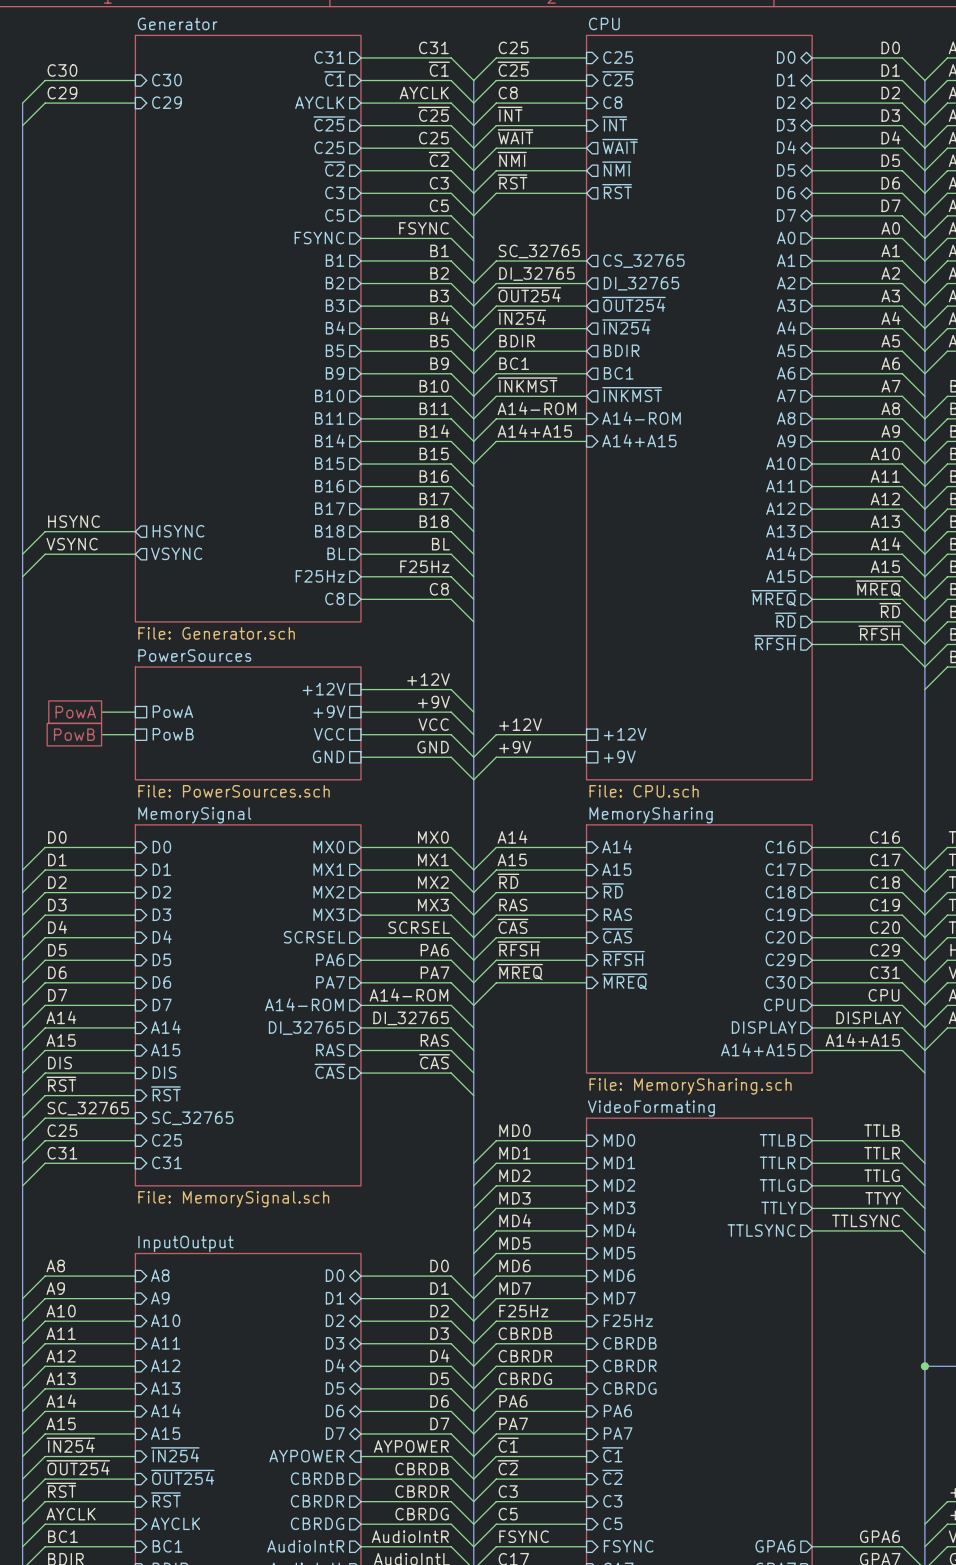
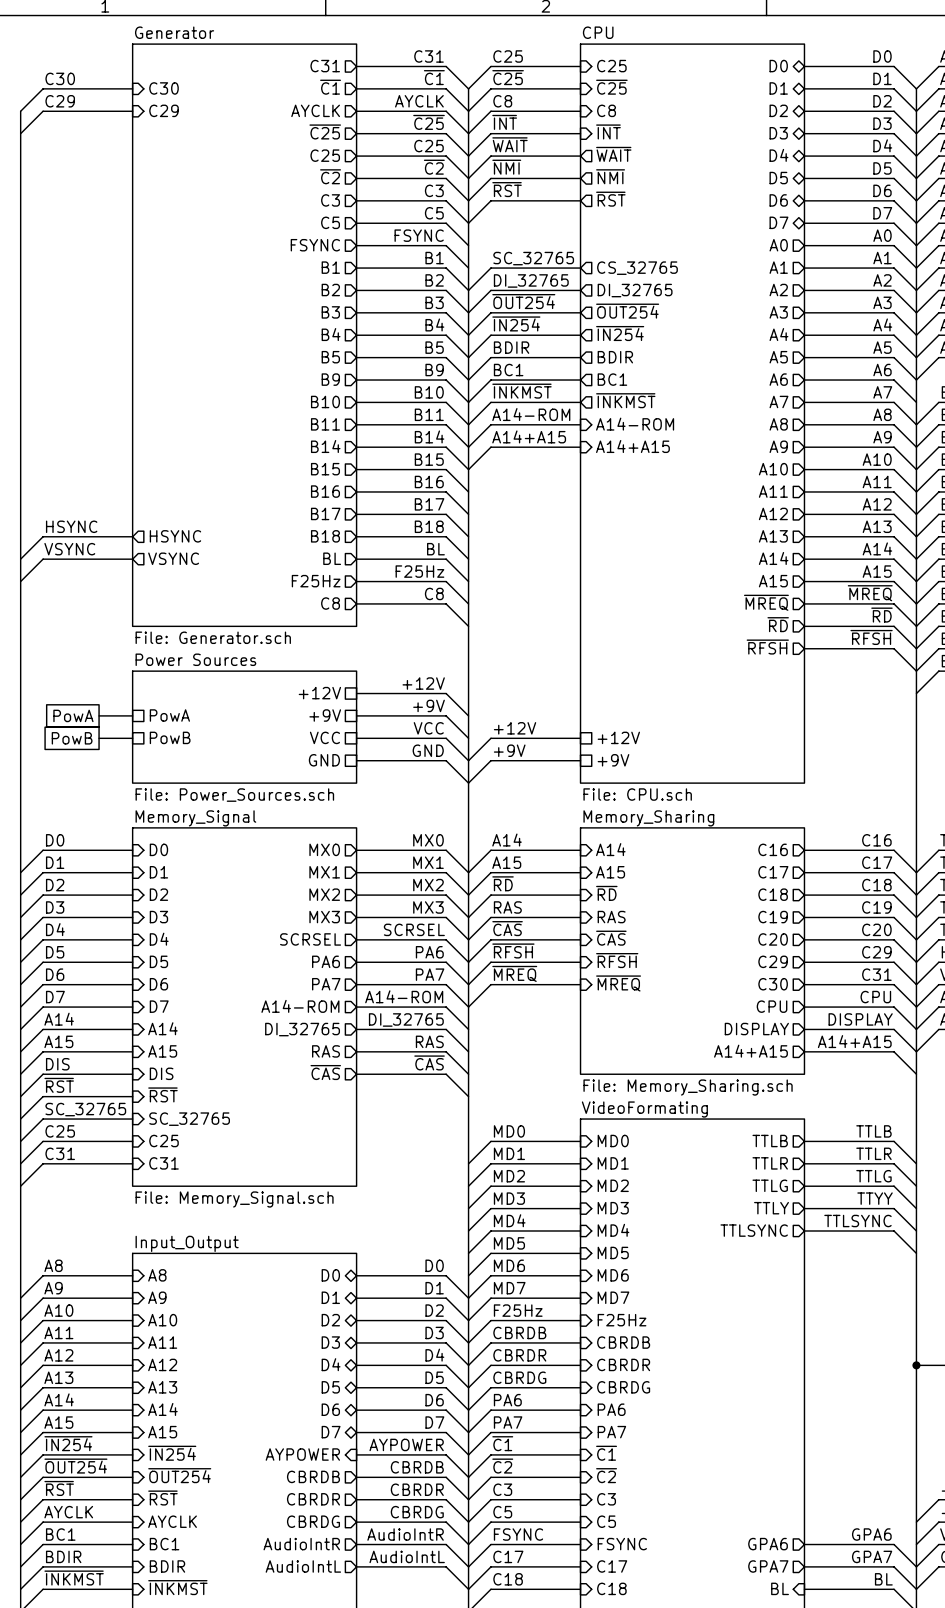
sheet PowerSources name: PowerSources (194, 655) -> Power Sources (195, 659)
sheet PowerSources value: File: PowerSources.sch (234, 791) -> File: Power_Sources.sch (234, 795)
sheet MemorySignal name: MemorySignal (194, 815) -> Memory_Signal (195, 818)
sheet MemorySharing name: MemorySharing (651, 815) -> Memory_Sharing (648, 818)
sheet MemorySharing value: File: MemorySharing.sch (690, 1086) -> File: Memory_Sharing.sch (688, 1087)
sheet MemorySignal value: File: MemorySignal.sch (233, 1199) -> File: Memory_Signal.sch (234, 1199)
sheet InputOutput name: InputOutput (185, 1243) -> Input_Output (187, 1243)

